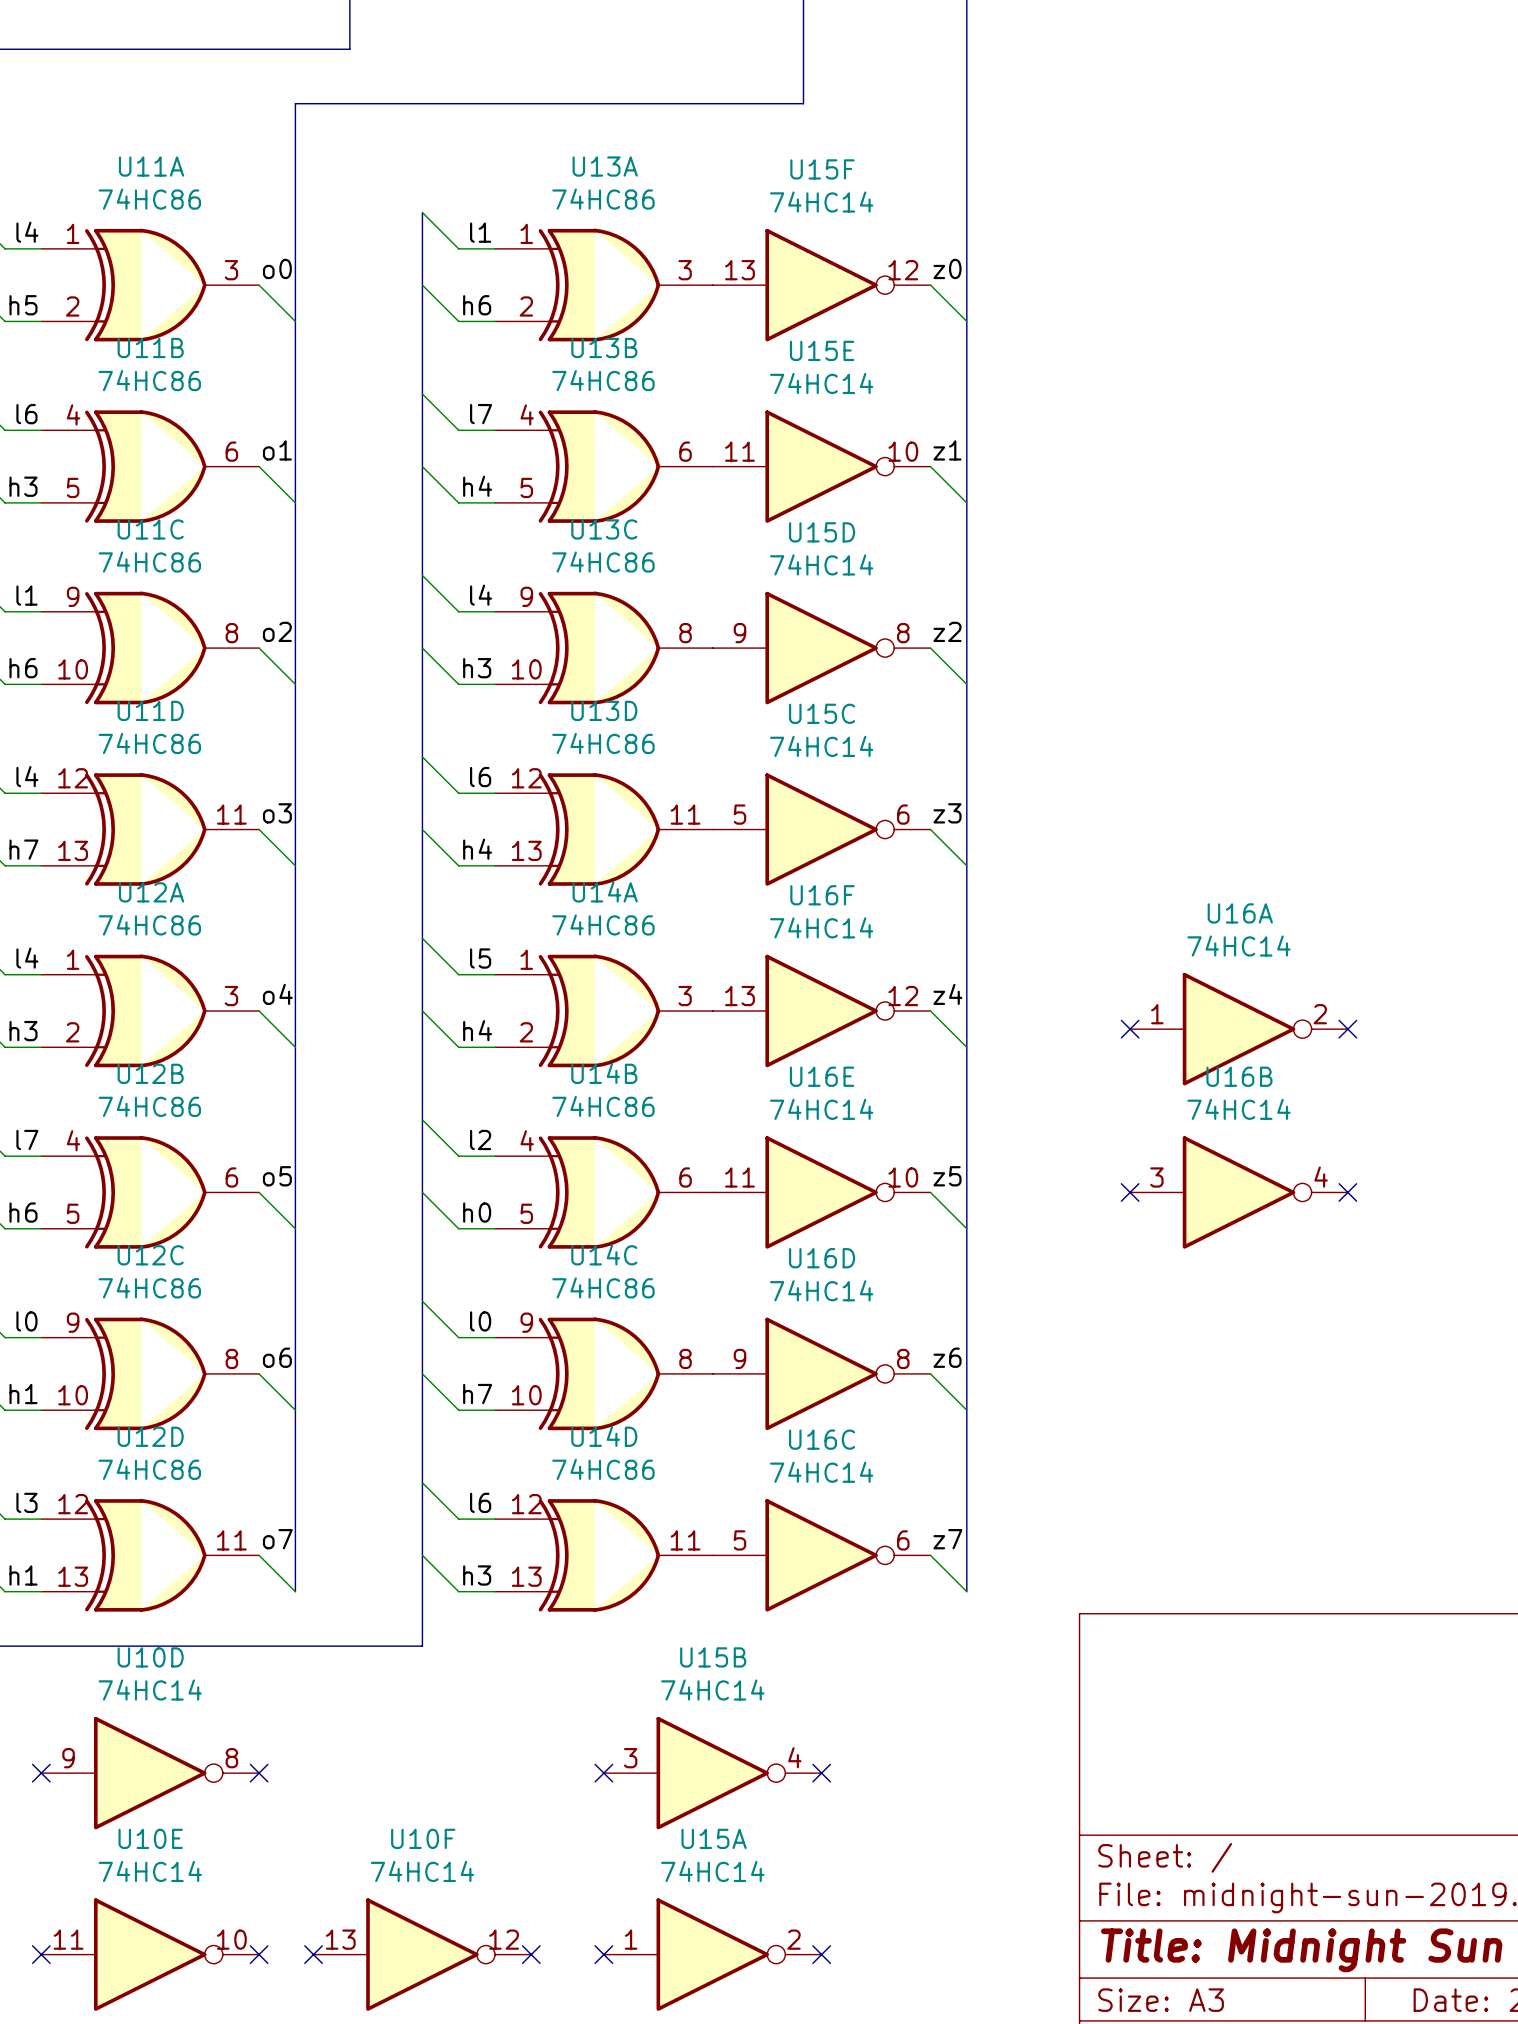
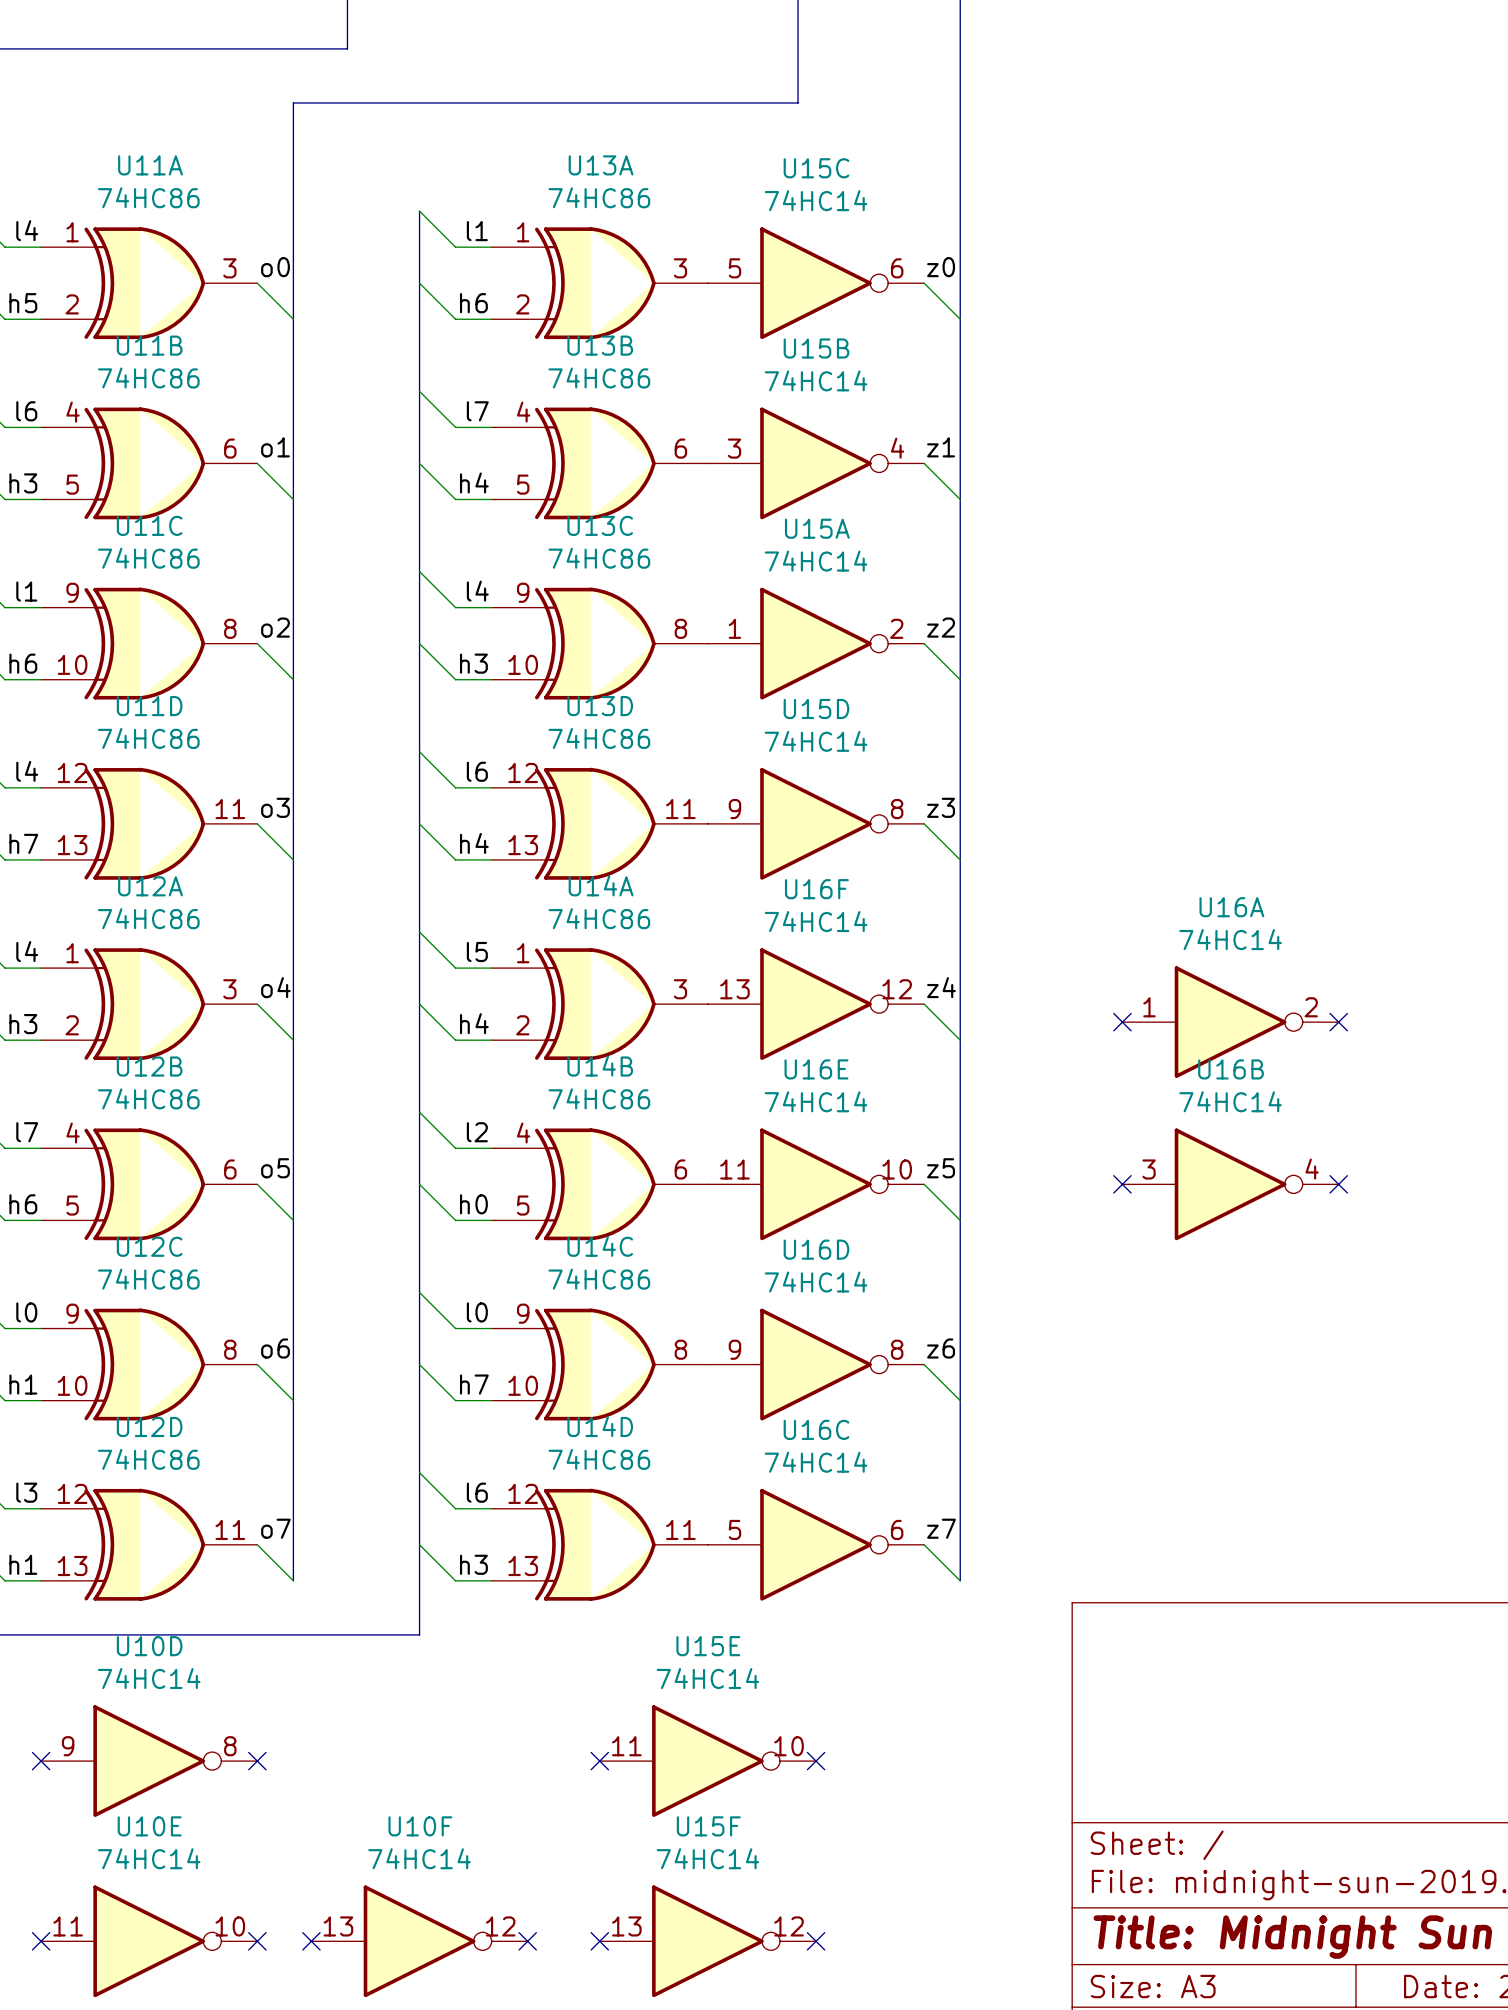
U15F position: (821, 285) -> (707, 1941)
U15E position: (821, 466) -> (707, 1761)
U15D position: (821, 648) -> (816, 823)
U15C position: (821, 829) -> (816, 283)
U15B position: (712, 1773) -> (816, 463)
U15A position: (712, 1954) -> (816, 643)

